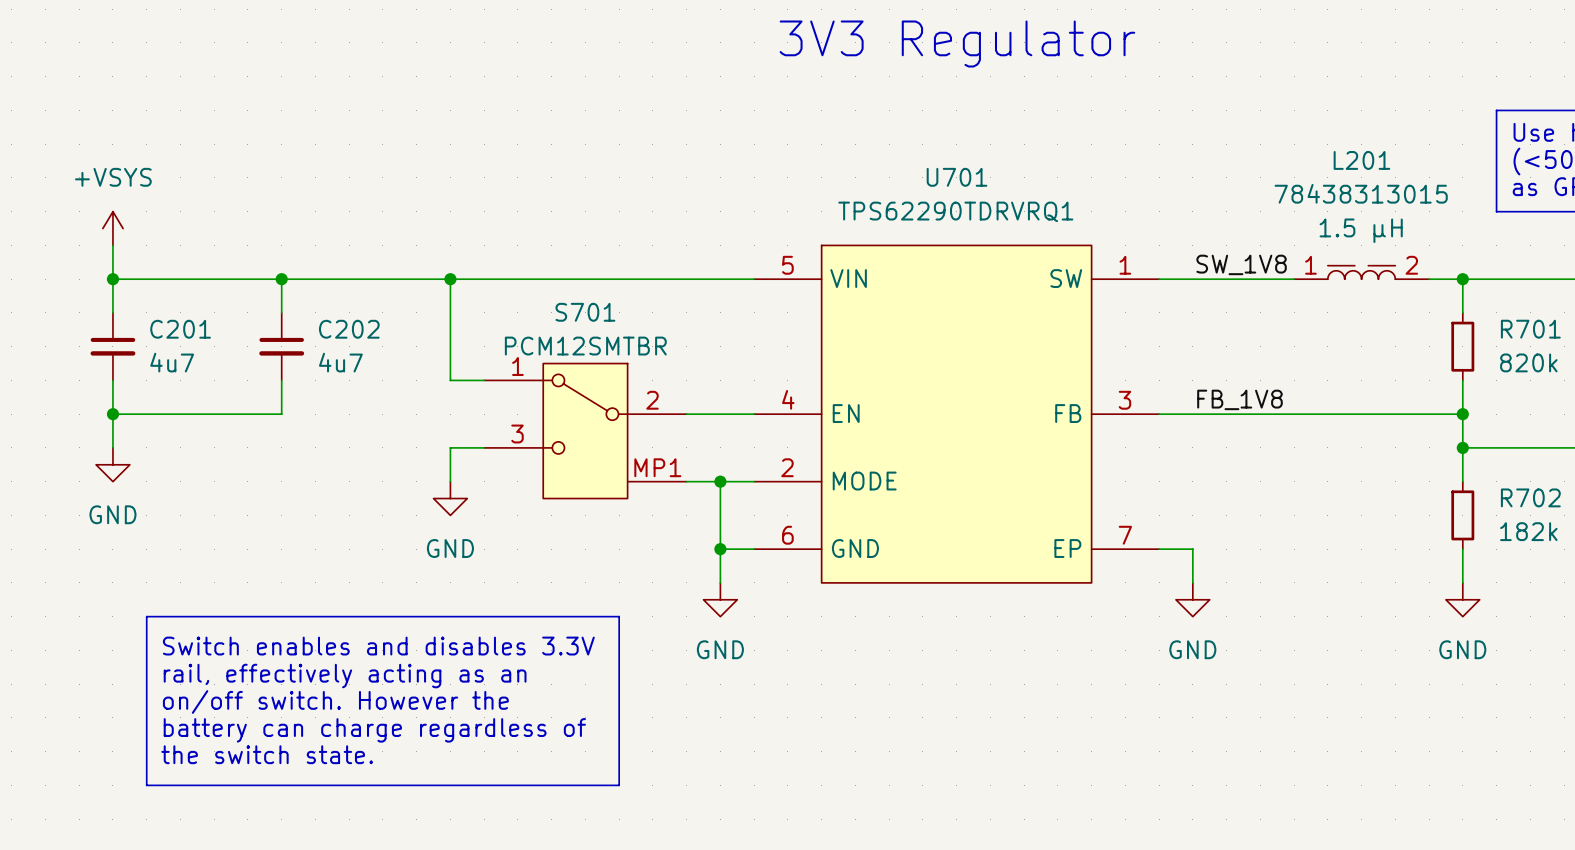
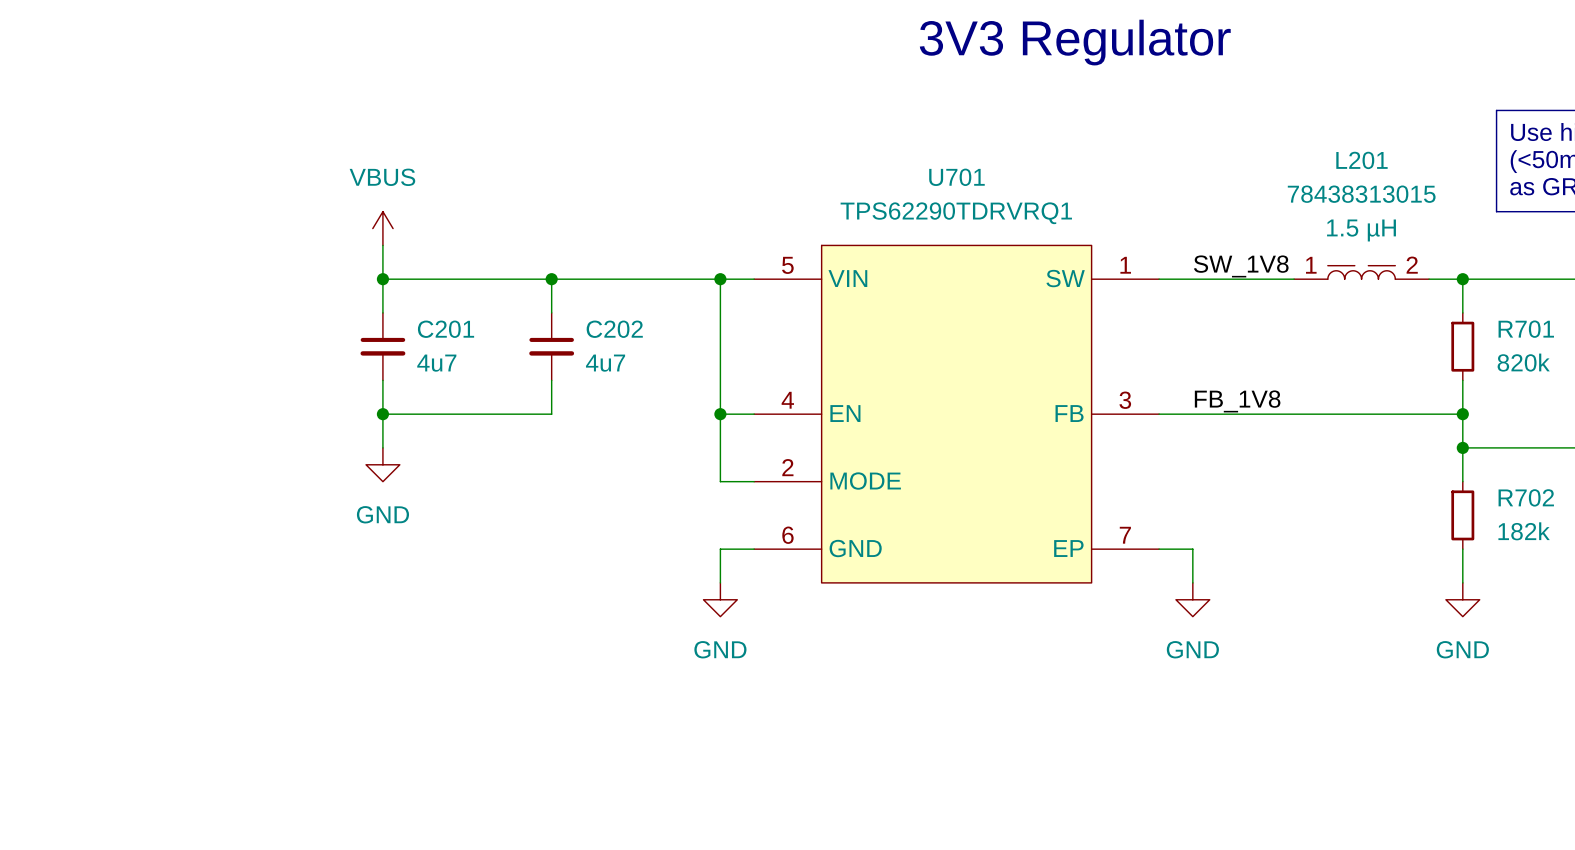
text position: 3V3 Regulator (957, 44) -> 3V3 Regulator (1075, 42)
power symbol: +VSYS (112, 228) -> none
power symbol: none -> VBUS (382, 228)
wire: (112, 245) (112, 312) -> (382, 245) (382, 312)
wire: (112, 279) (382, 279) -> none
junction: (112, 279) -> none
wire: (281, 279) (281, 312) -> (551, 279) (551, 312)
junction: (281, 279) -> none
junction: none -> (382, 279)
wire: (450, 279) (450, 380) (484, 380) -> none
junction: (450, 279) -> none
junction: none -> (551, 279)
wire: none -> (720, 279) (720, 481)
junction: none -> (720, 279)
C201 position: (112, 346) -> (382, 346)
C202 position: (281, 346) -> (551, 346)
wire: (112, 380) (112, 447) -> (382, 380) (382, 447)
wire: (281, 380) (281, 414) (112, 414) -> (551, 380) (551, 414) (382, 414)
junction: (112, 414) -> none
junction: none -> (382, 414)
wire: (686, 414) (720, 414) -> none
junction: none -> (720, 414)
S701: PCM12SMTBR (585, 431) -> none
wire: (484, 447) (450, 447) (450, 481) -> none
power symbol: GND (112, 464) -> none
wire: (686, 481) (720, 481) (720, 549) -> none
junction: (720, 481) -> none
power symbol position: GND (450, 498) -> GND (382, 464)
junction: (720, 549) -> none
line: (146, 616) (619, 616) (619, 785) (146, 785) (146, 616) -> none
text: Switch enables and disables 3.3V (378, 646) -> none
text: rail, effectively acting as an (345, 676) -> none
text: on/off switch. However the (335, 701) -> none
text: battery can charge regardless of (374, 730) -> none
text: the switch state. (267, 754) -> none

